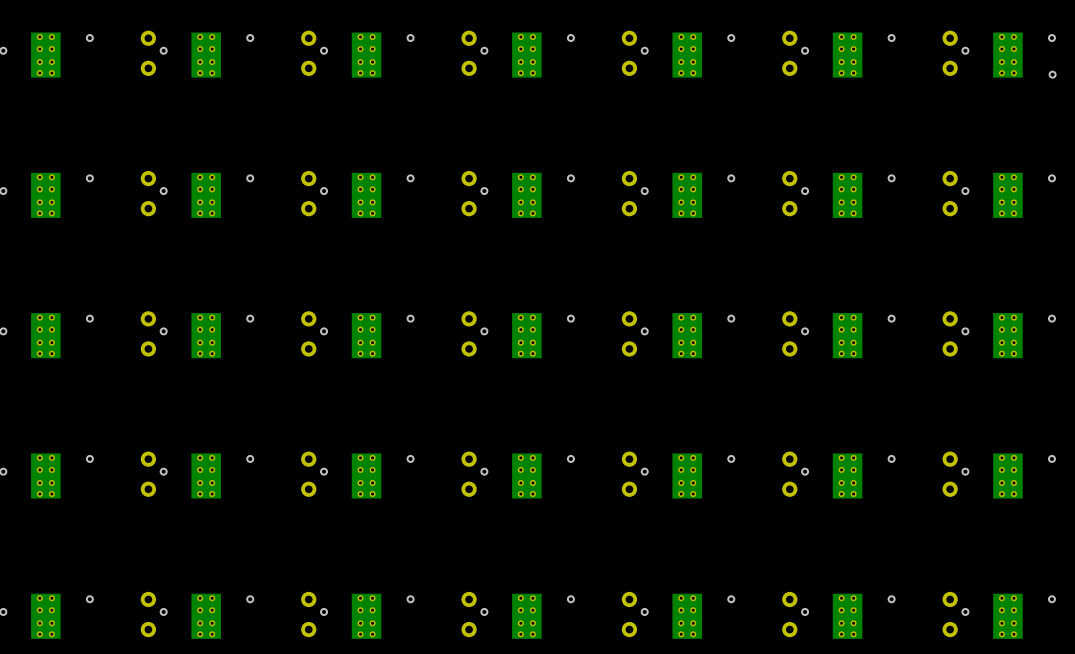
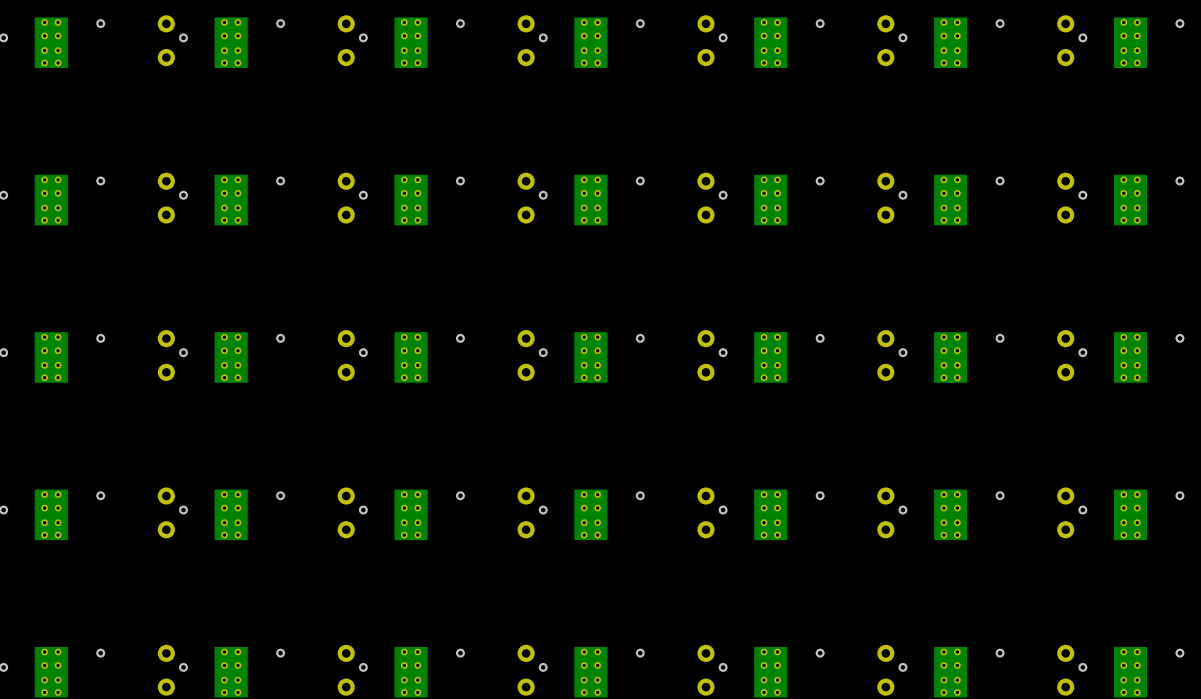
via: (1052, 74) -> none

